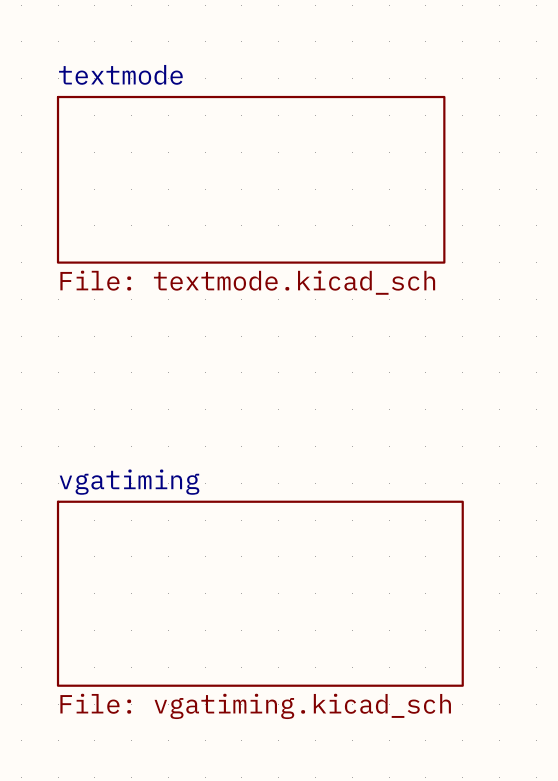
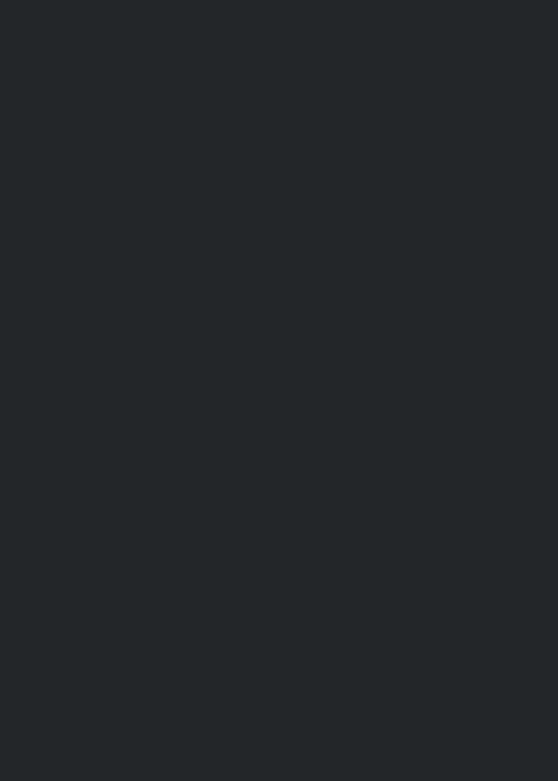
sheet textmode: File: textmode.kicad_sch (251, 179) -> none
sheet vgatiming: File: vgatiming.kicad_sch (260, 593) -> none

